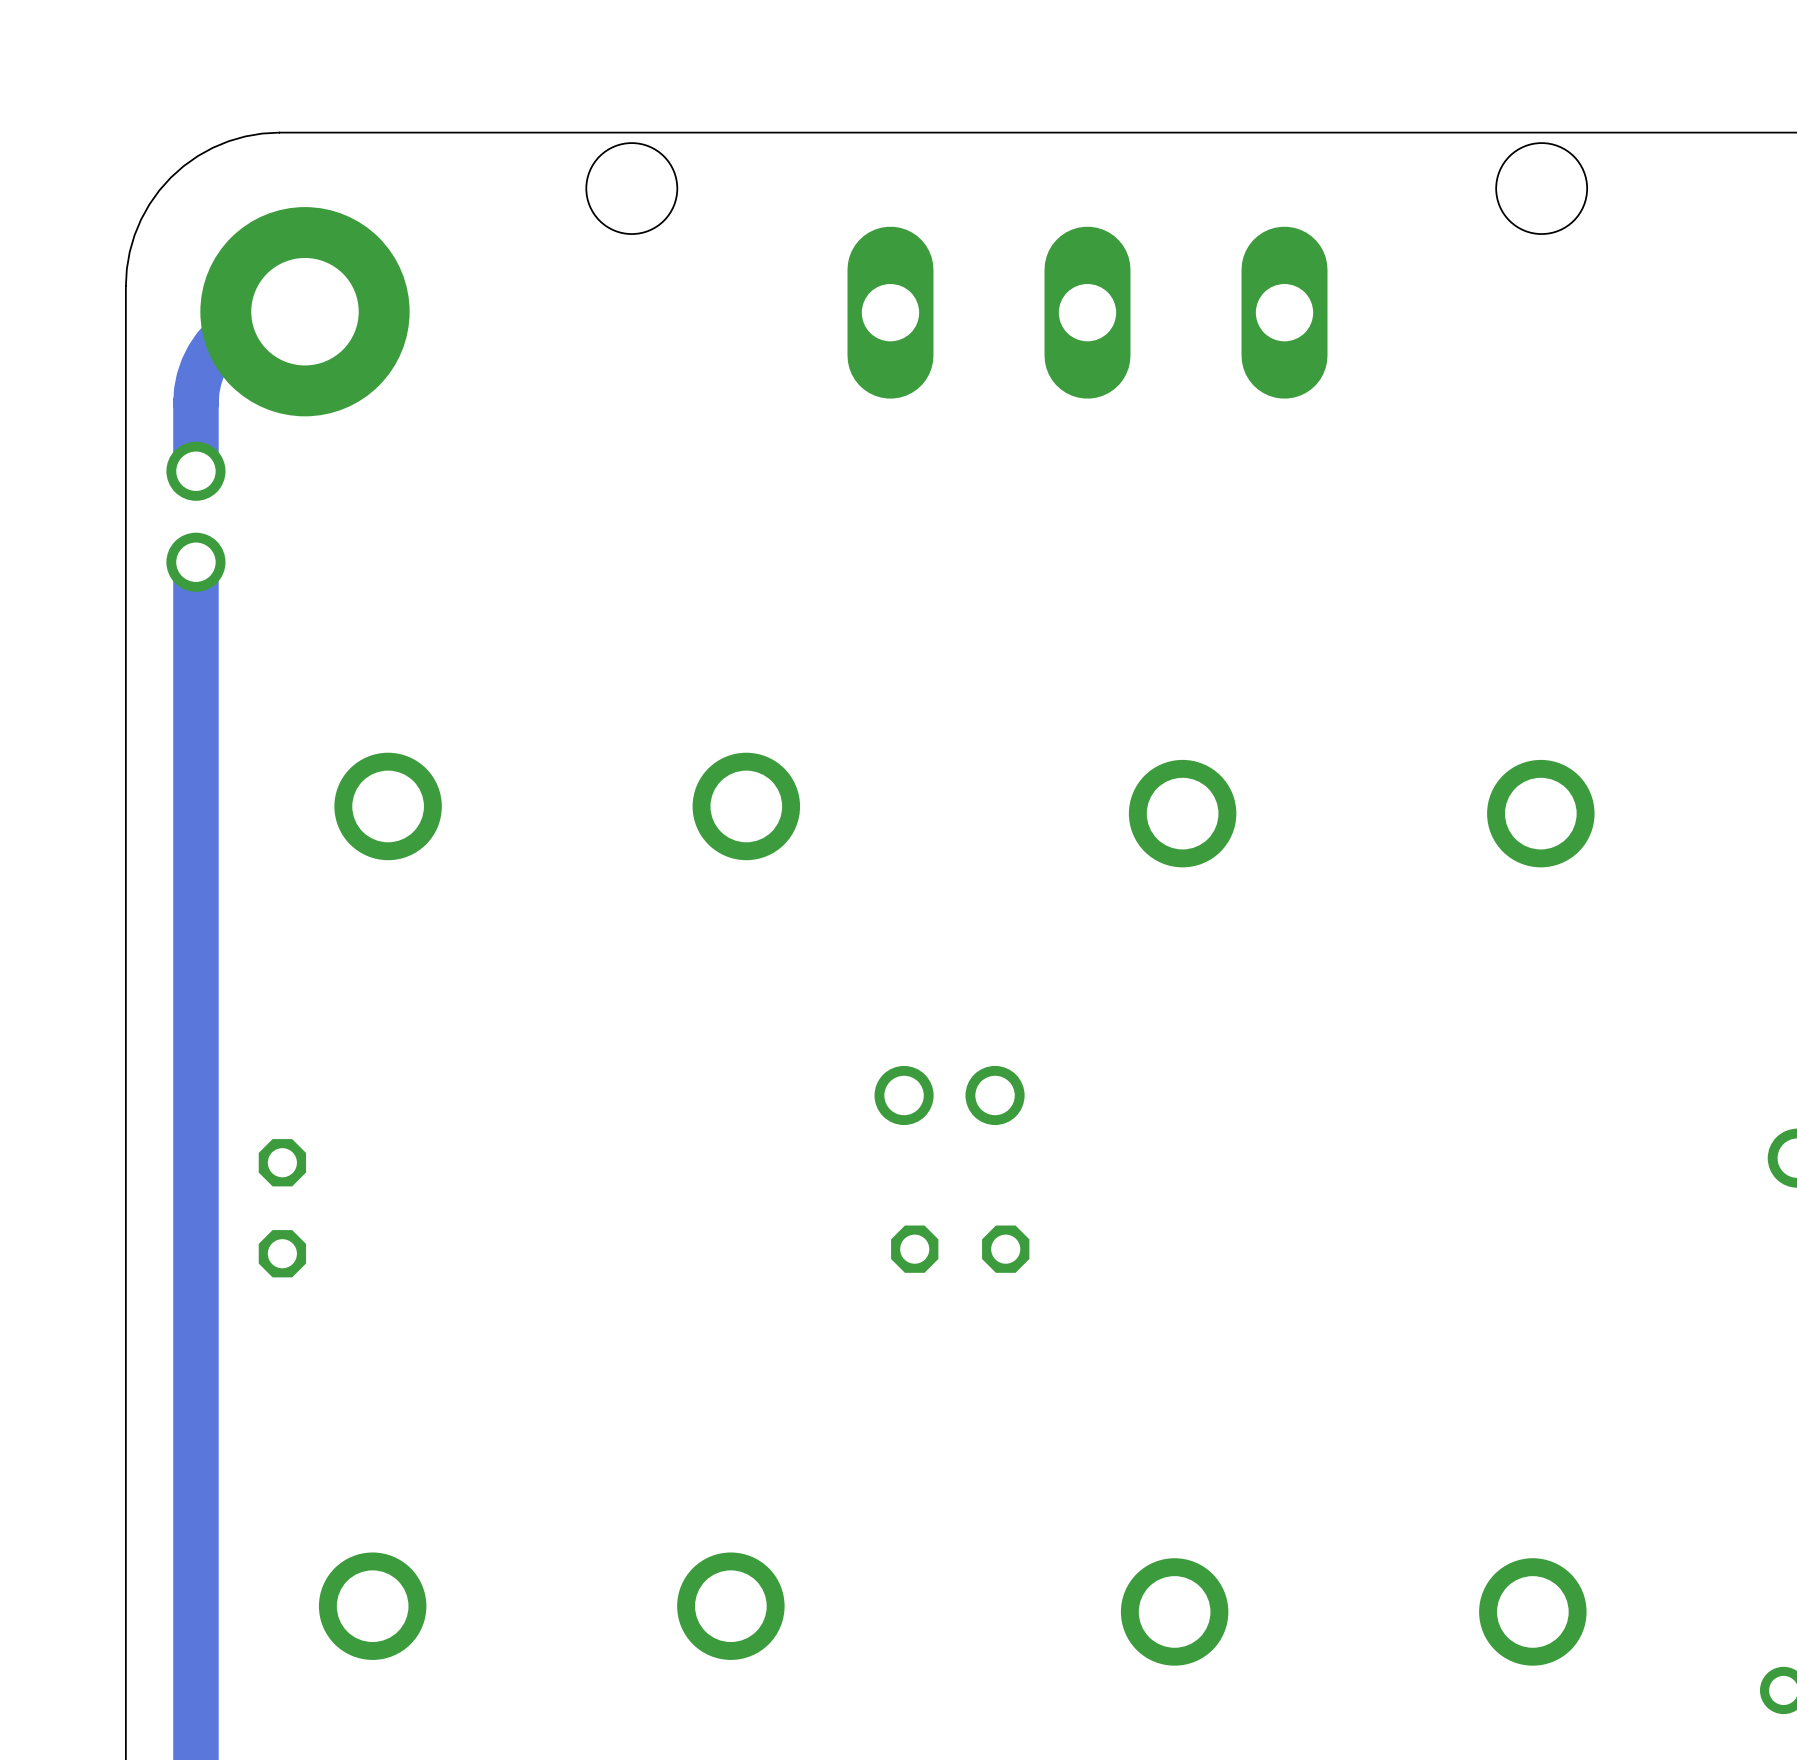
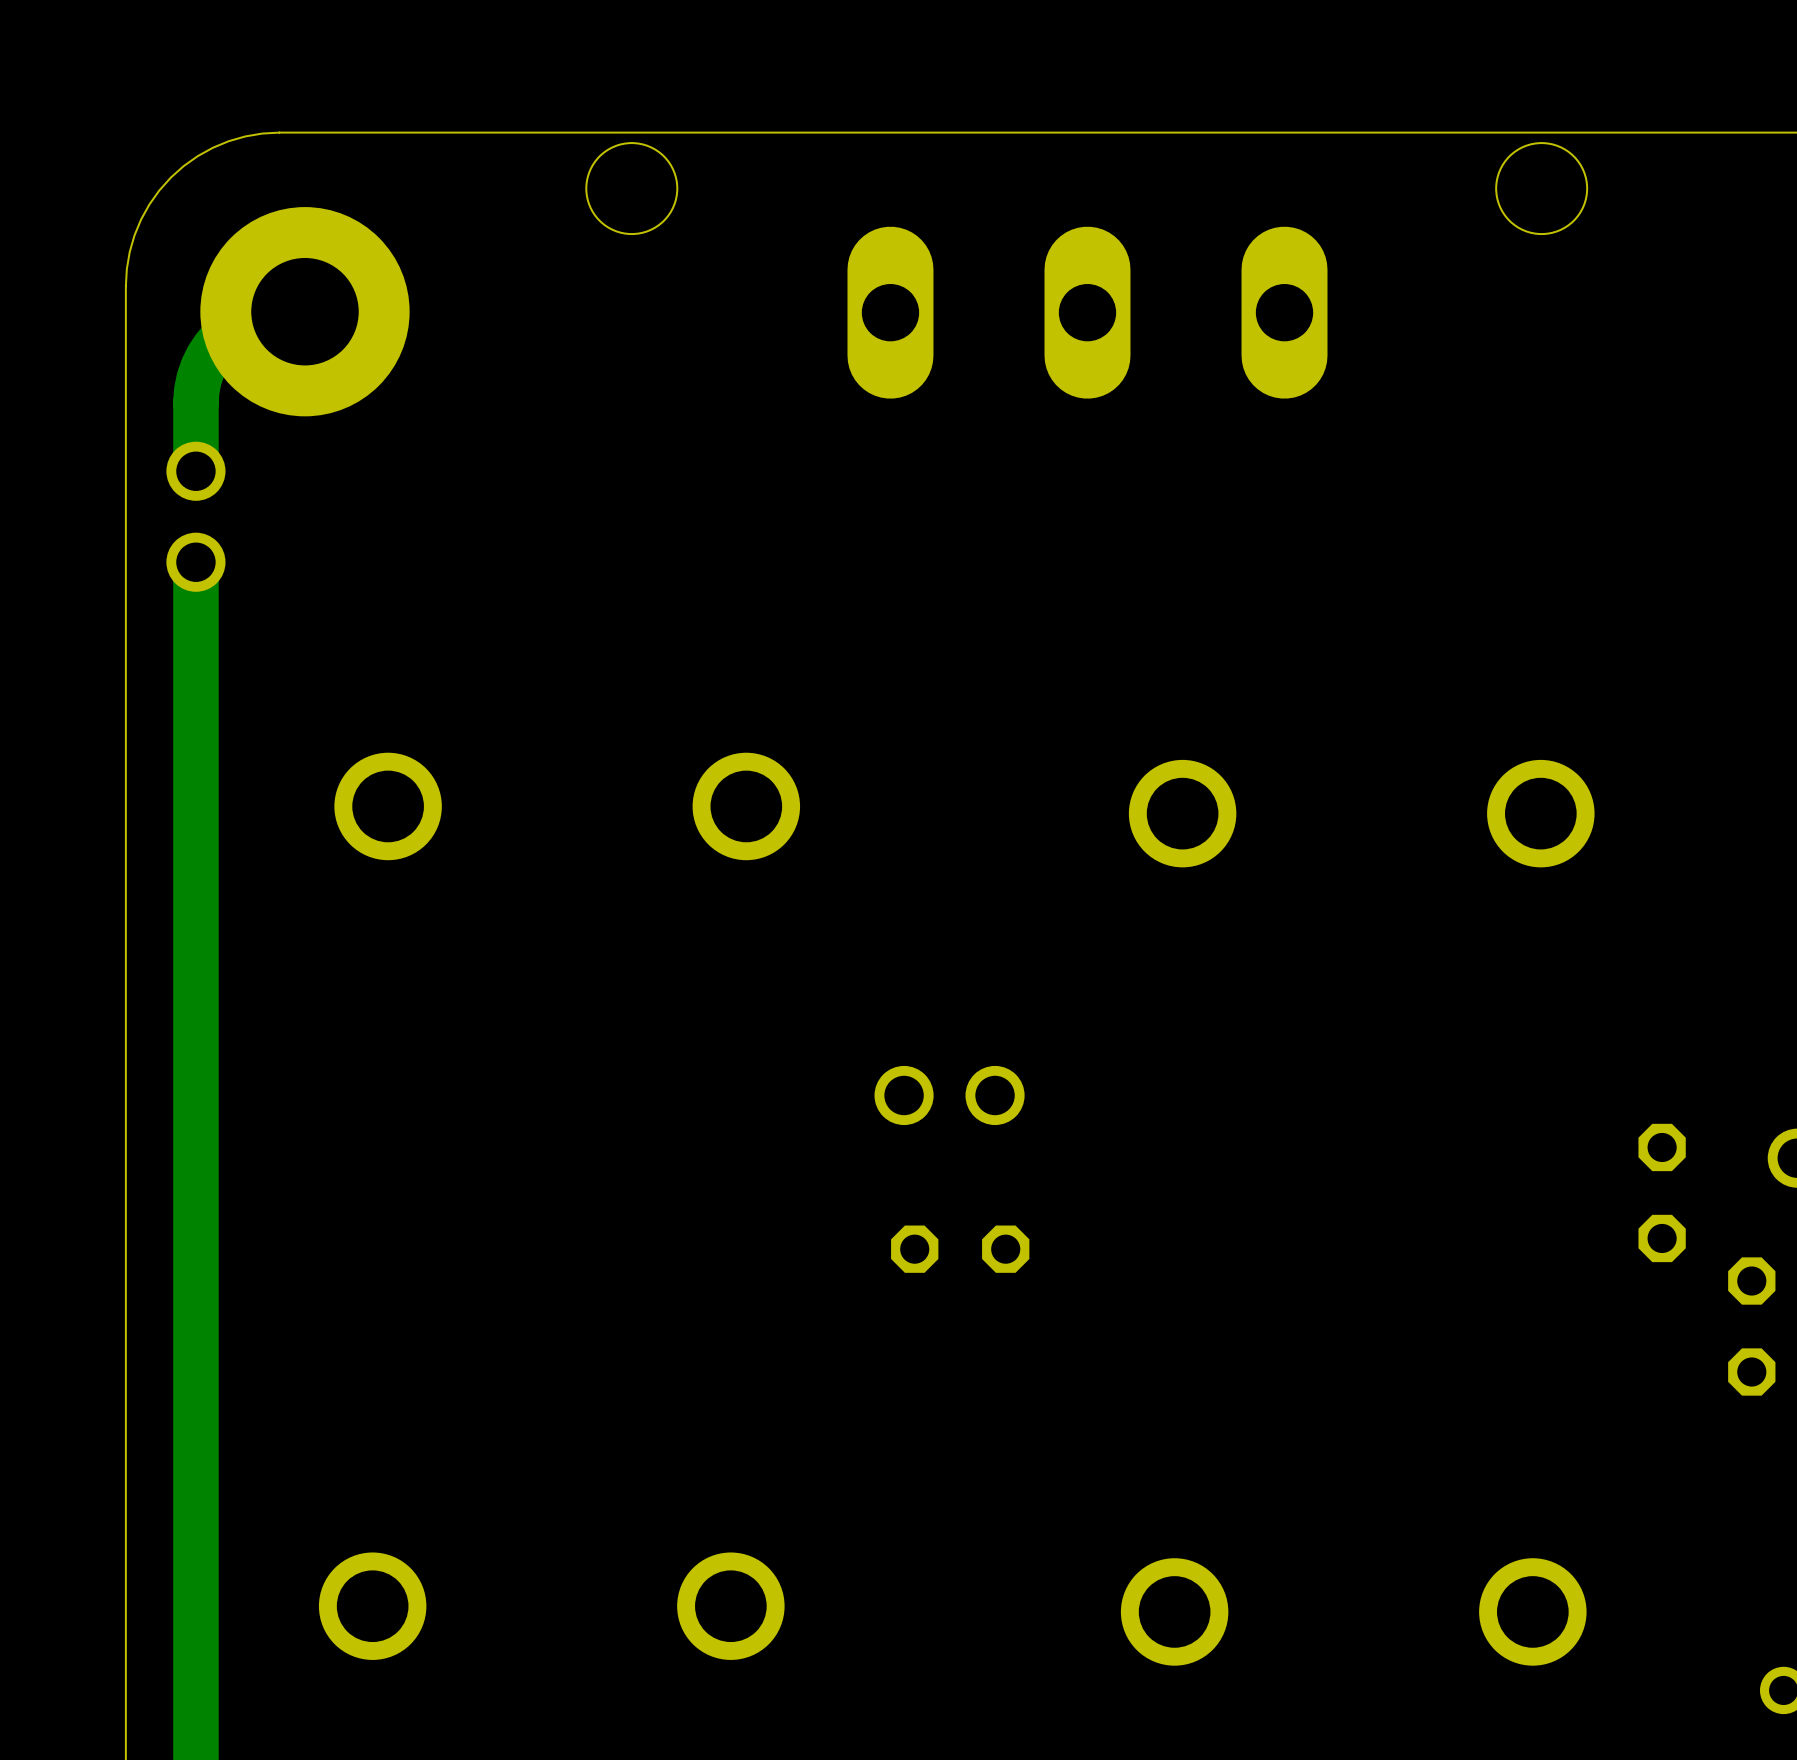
part: none -> (1662, 1192)
part: (282, 1208) -> none
part: none -> (1751, 1326)

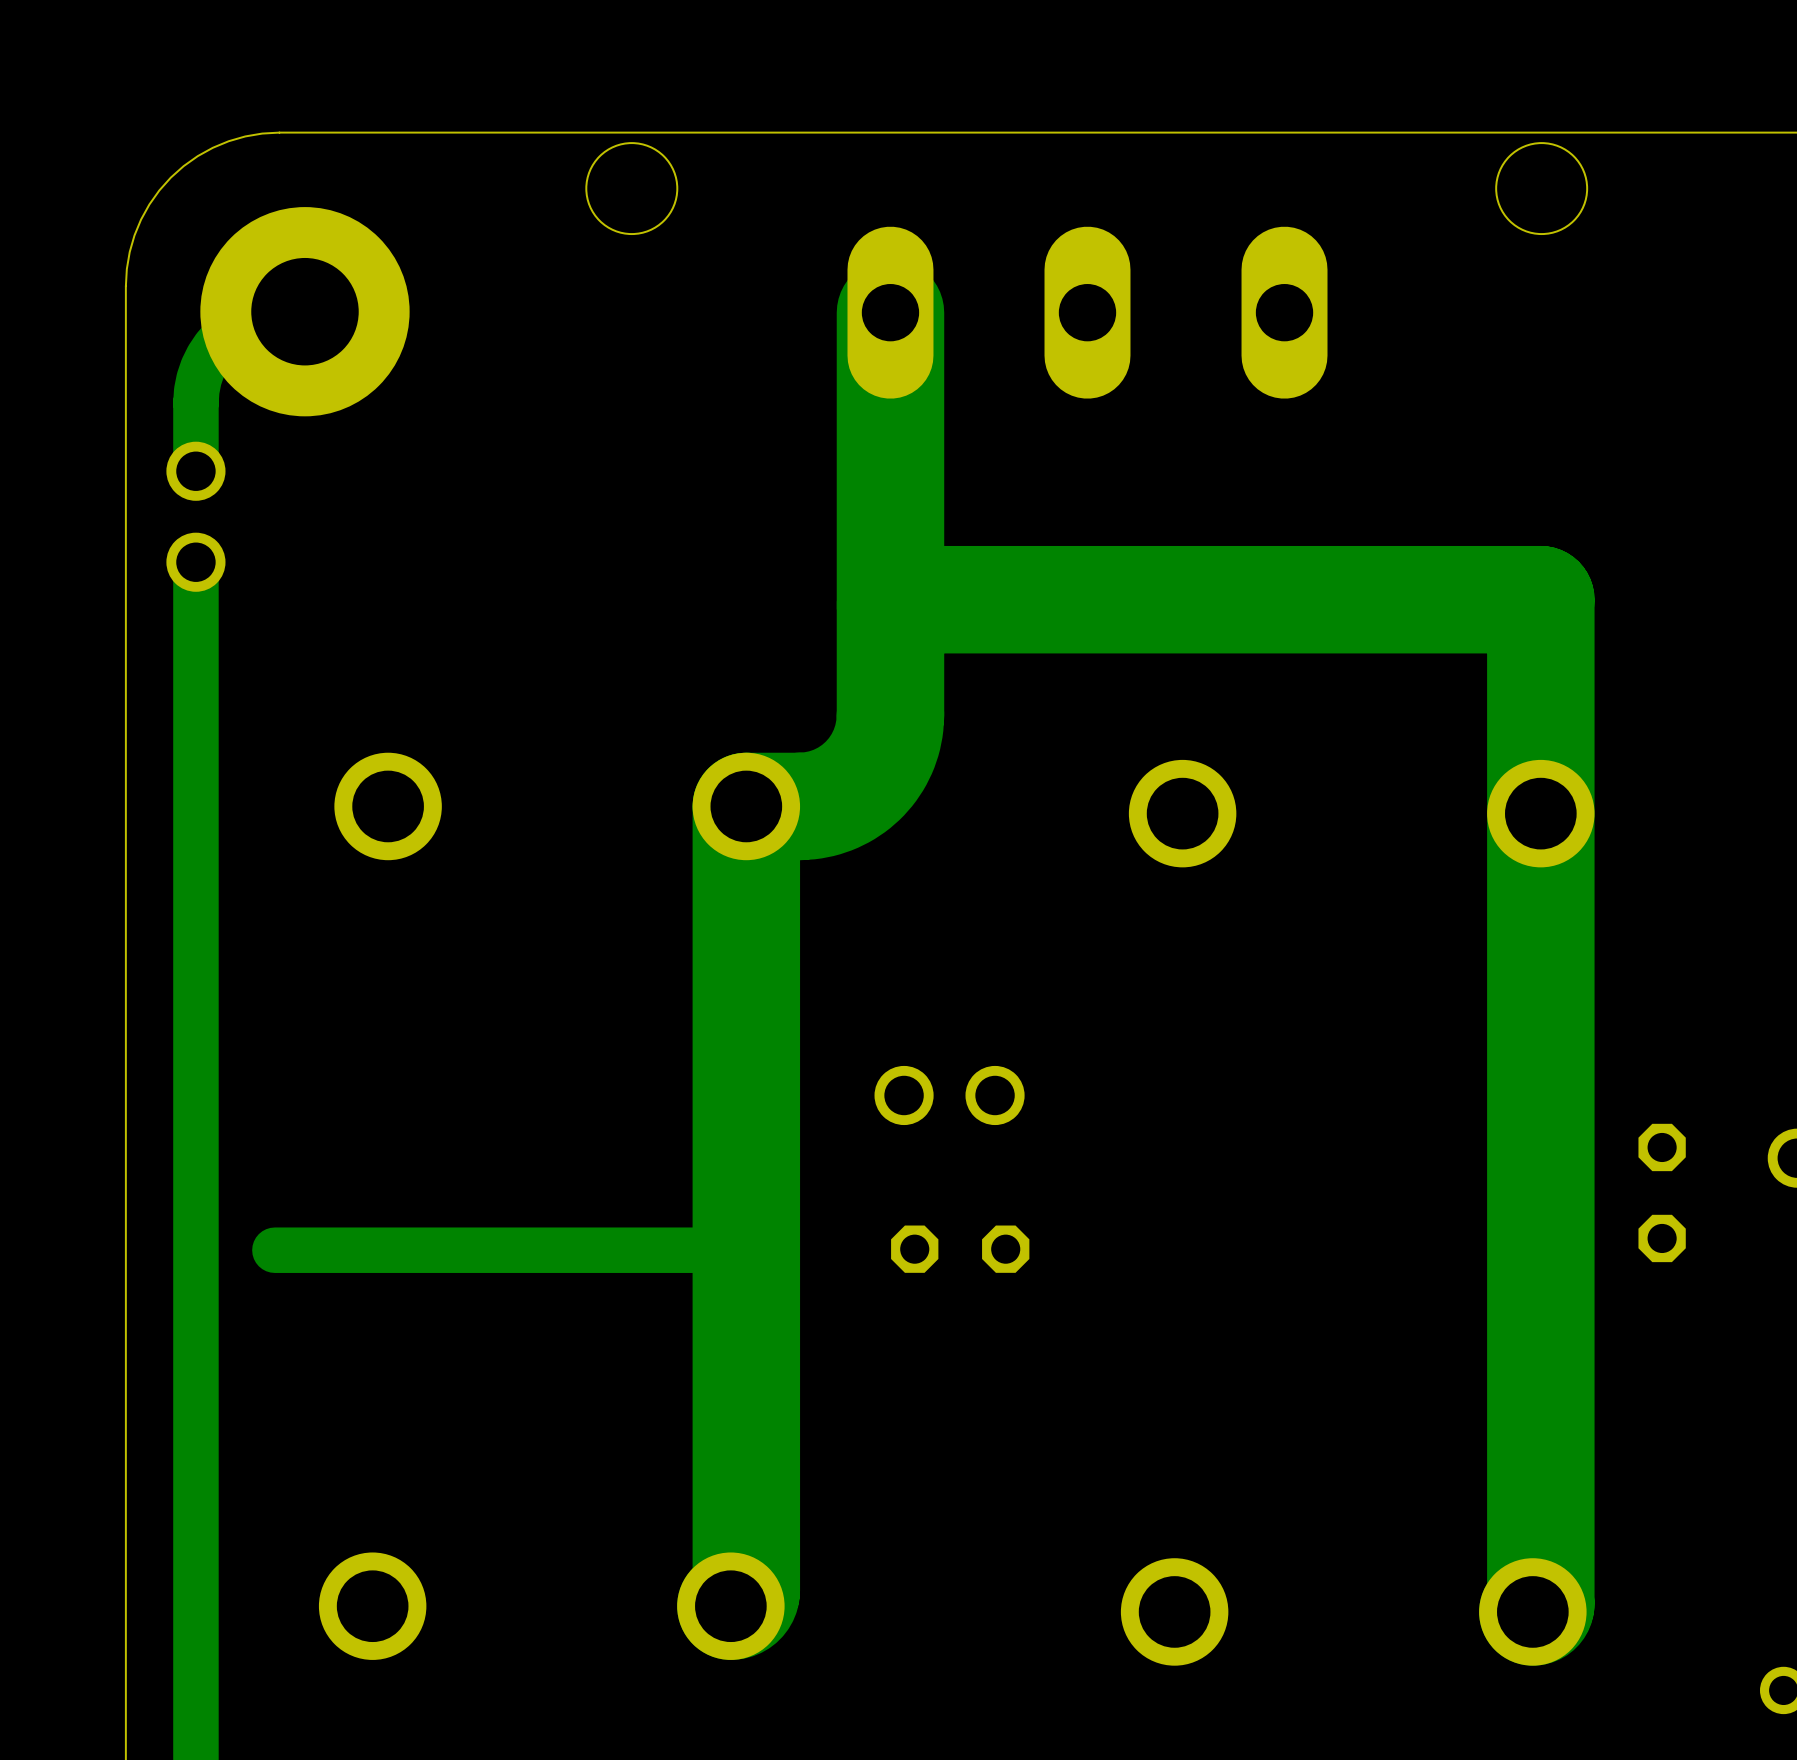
track: none -> (890, 312) (890, 715) (887, 739) (878, 760) (871, 770) (854, 787) (834, 799) (811, 805) (746, 806) (746, 1590) (741, 1601) (730, 1606)
track: none -> (890, 605) (892, 601) (896, 599) (1540, 599) (1540, 1603) (1538, 1609) (1532, 1611)
track: none -> (746, 1250) (274, 1250)
part: (1751, 1326) -> none

